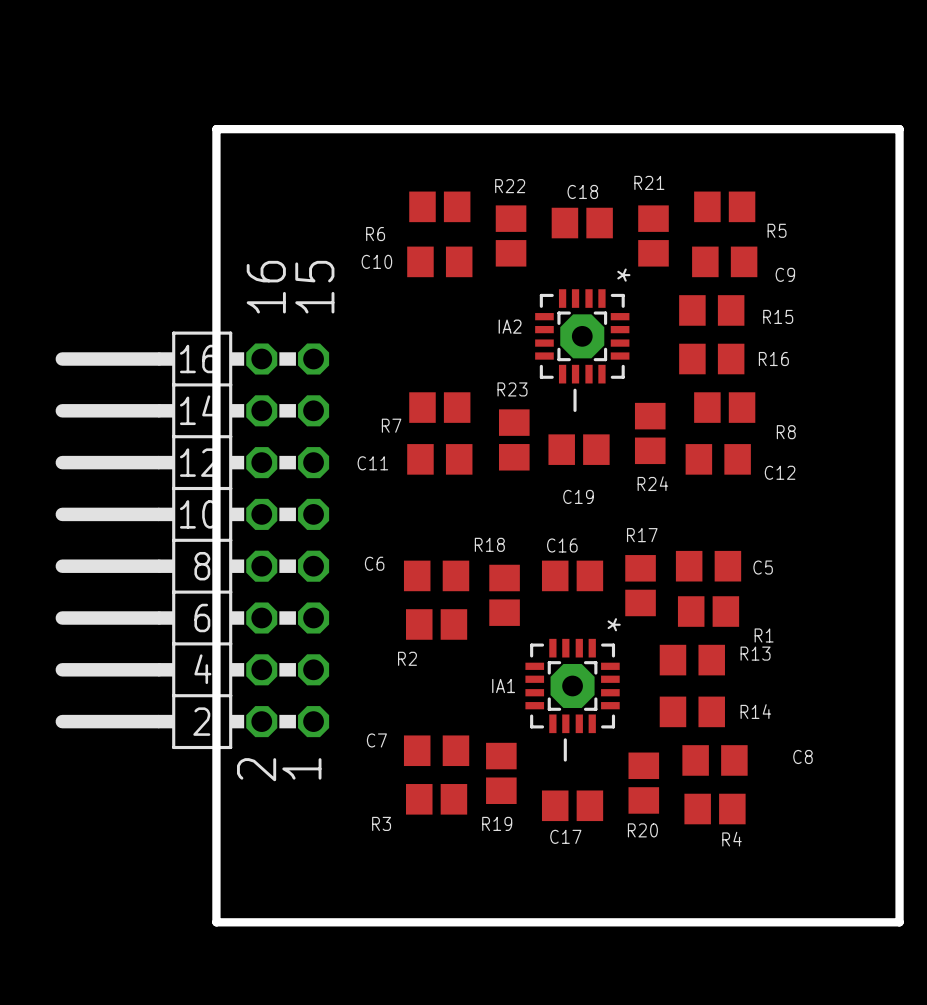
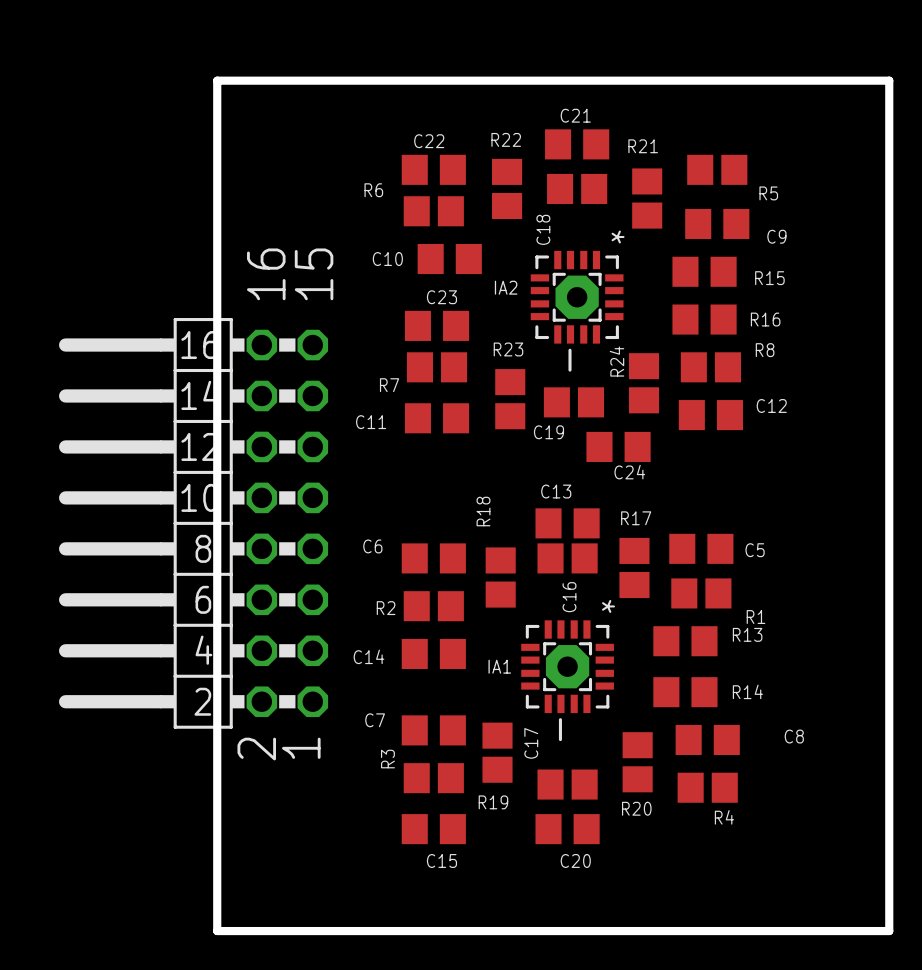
board edge: (216, 129) (899, 129) -> (217, 118) (217, 80) (889, 80) (889, 118)
C21: none -> (577, 144)
C22: none -> (433, 169)
C18 name rotation: 0° (582, 191) -> 90° counterclockwise (543, 229)
C18 name position: C18 (582, 191) -> C18 (543, 229)
R6 position: (439, 206) -> (433, 211)
R5 position: (724, 206) -> (717, 169)
C18 position: (582, 223) -> (577, 188)
R6 name position: R6 (375, 234) -> R6 (373, 190)
R22 position: (511, 235) -> (507, 188)
R21 position: (653, 235) -> (647, 198)
C10 position: (439, 261) -> (449, 259)
C9 position: (724, 261) -> (717, 223)
R15 position: (711, 310) -> (704, 271)
part position: (582, 336) -> (577, 297)
C23: none -> (437, 325)
IA2 position: (582, 350) -> (577, 311)
R16 position: (711, 359) -> (704, 319)
R7 position: (439, 407) -> (437, 367)
R8 position: (724, 407) -> (710, 367)
R8 name position: R8 (786, 432) -> R8 (765, 350)
R24 position: (650, 433) -> (644, 383)
R23 position: (514, 439) -> (510, 399)
C19 position: (579, 449) -> (573, 402)
C11 position: (439, 459) -> (437, 418)
C12 position: (718, 459) -> (710, 415)
C24: none -> (618, 446)
C12 name position: C12 (780, 472) -> C12 (771, 405)
R24 name rotation: 0° (652, 483) -> 90° counterclockwise (616, 361)
R24 name position: R24 (652, 483) -> R24 (616, 361)
C19 name position: C19 (578, 496) -> C19 (548, 432)
C13: none -> (567, 523)
R18 name rotation: 0° (489, 544) -> 90° counterclockwise (483, 511)
C16 name rotation: 0° (562, 545) -> 90° counterclockwise (569, 597)
C16 name position: C16 (562, 545) -> C16 (569, 597)
R2 name position: R2 (407, 658) -> R2 (386, 608)
C14: none -> (433, 653)
R3 name rotation: 0° (381, 823) -> 90° counterclockwise (387, 759)
R3 name position: R3 (381, 823) -> R3 (387, 759)
C17 name rotation: 0° (565, 836) -> 90° counterclockwise (531, 743)
C17 name position: C17 (565, 836) -> C17 (531, 743)
C15: none -> (433, 829)
C20: none -> (567, 829)
board edge: (216, 922) (899, 922) -> (217, 899) (217, 931) (889, 931) (889, 899)

